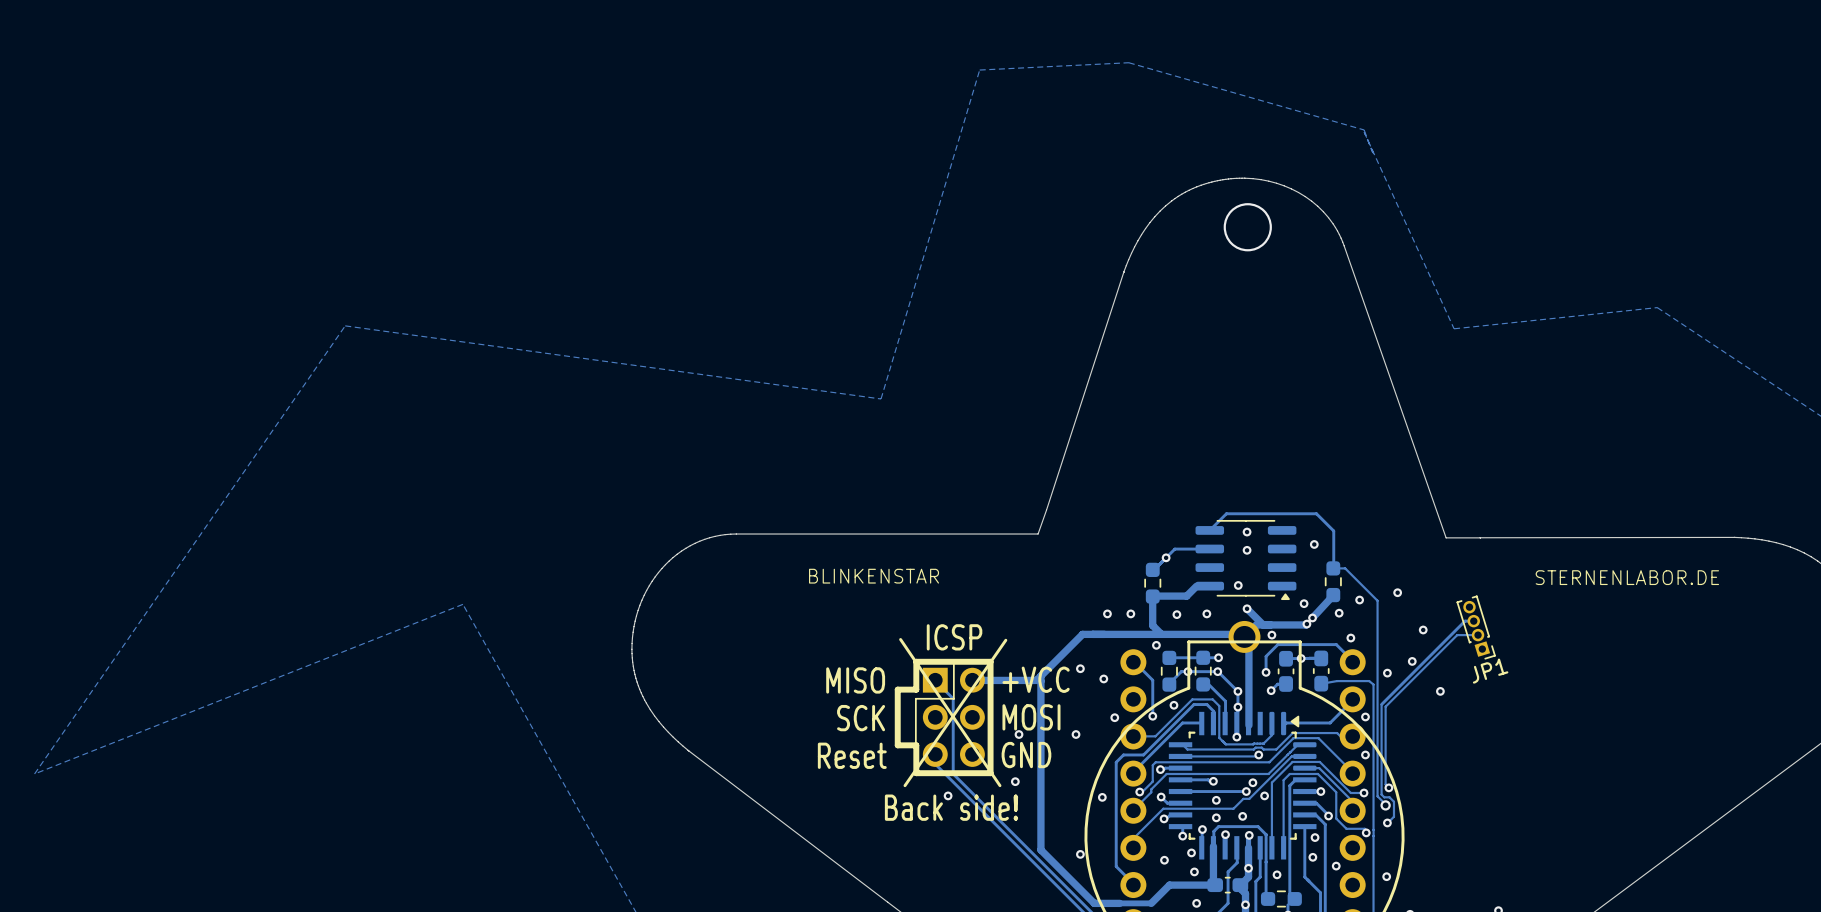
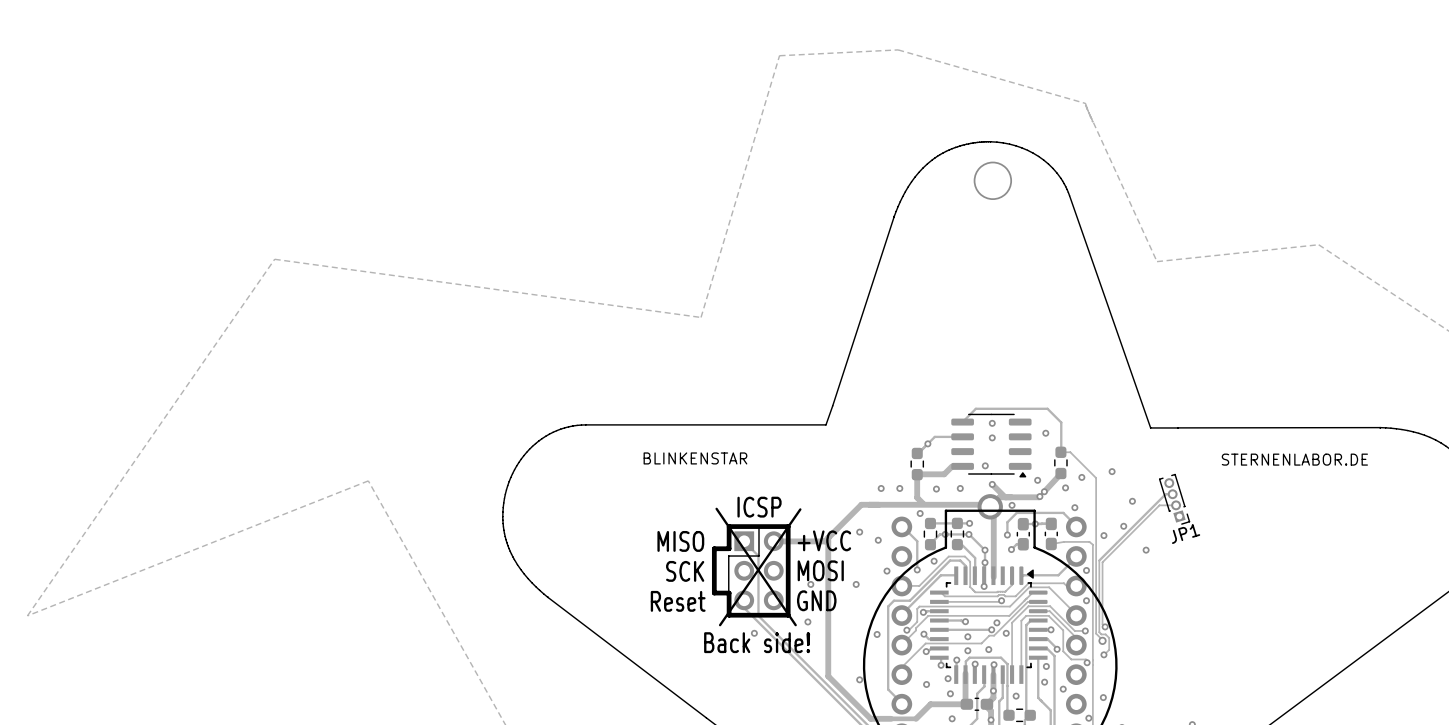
via: none -> (1088, 718)

